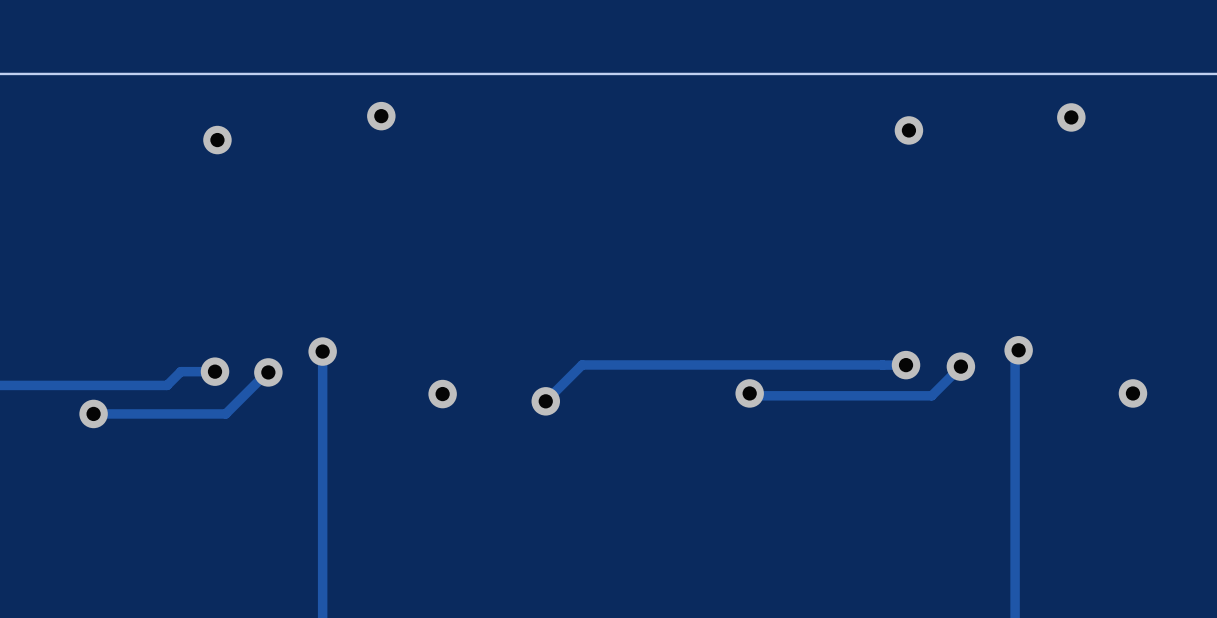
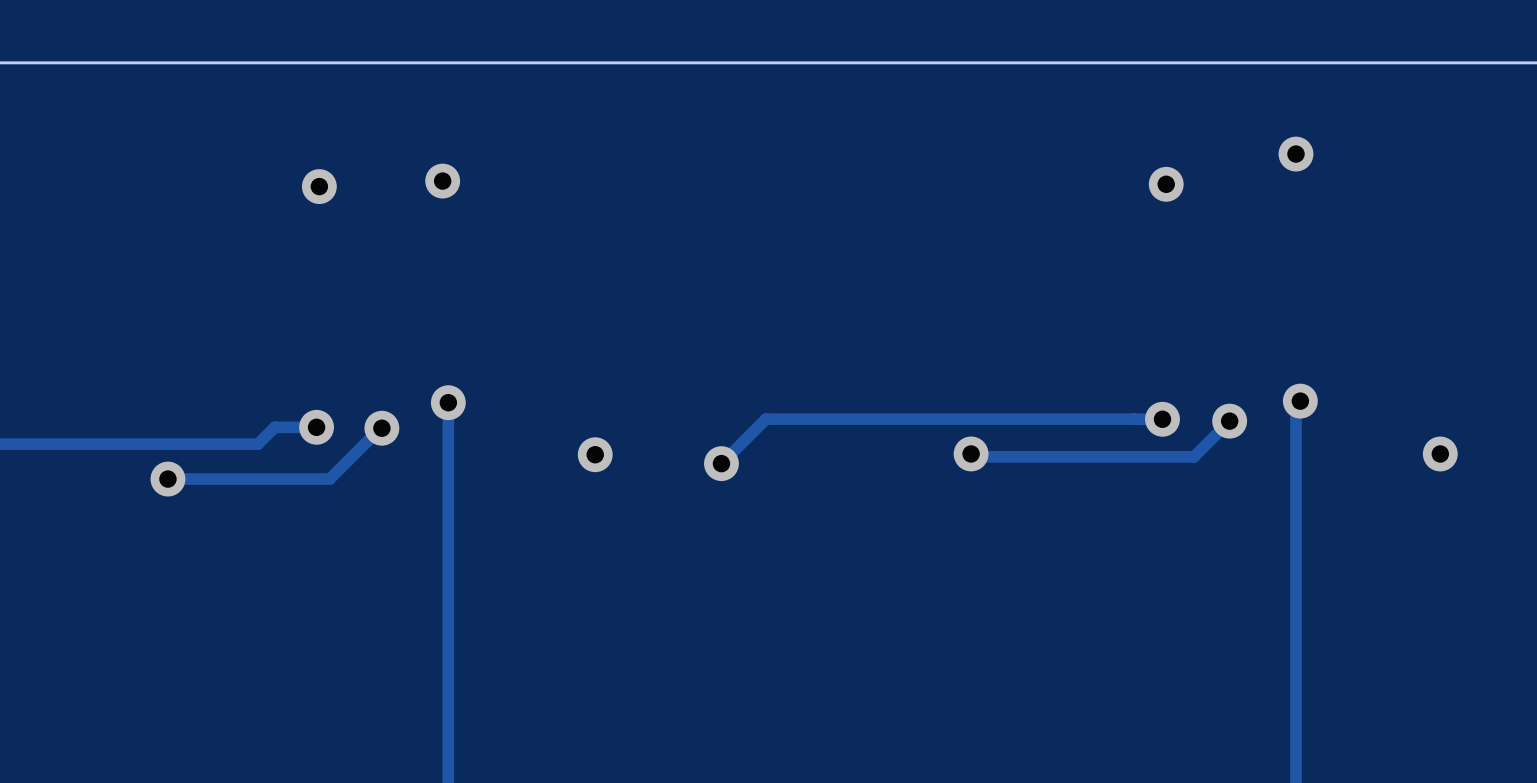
via: (381, 116) -> none
via: (1071, 117) -> none
via position: (908, 130) -> (1166, 184)
via position: (217, 140) -> (319, 186)
via: none -> (1295, 154)
via: none -> (442, 181)

